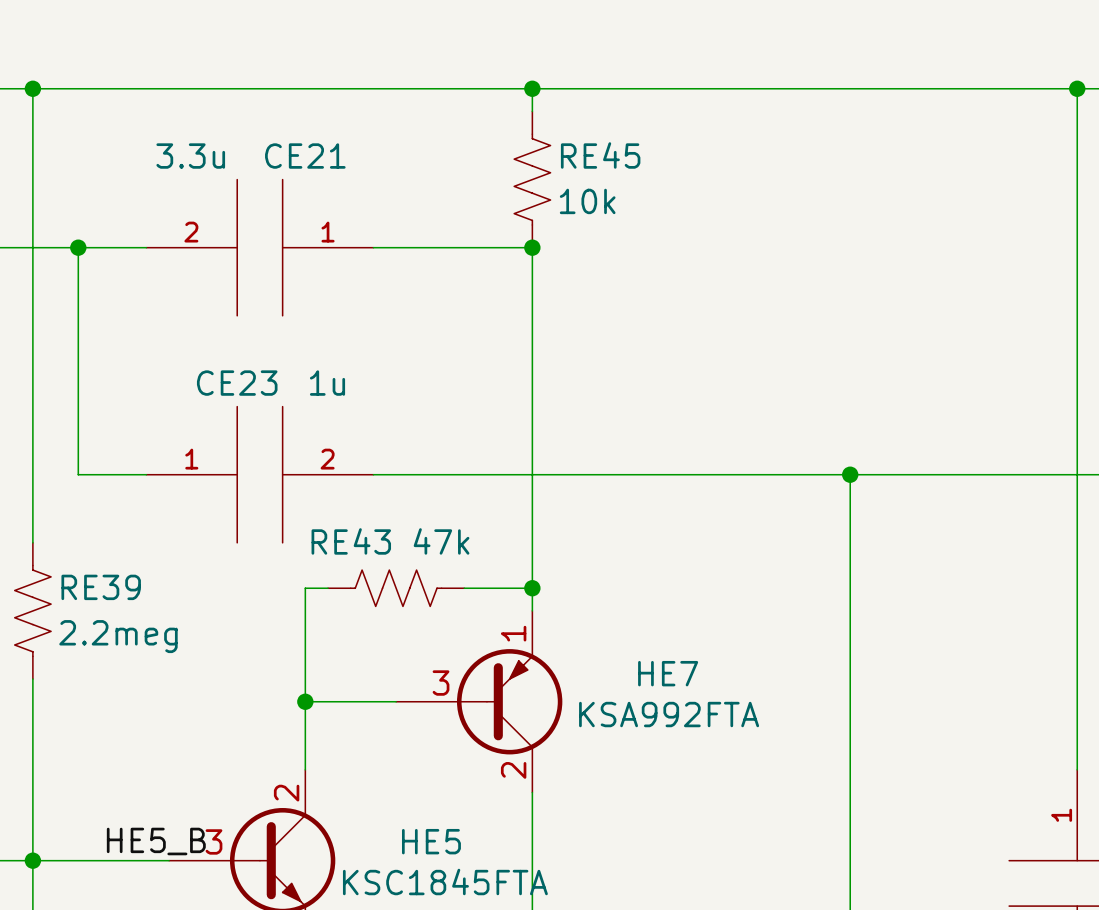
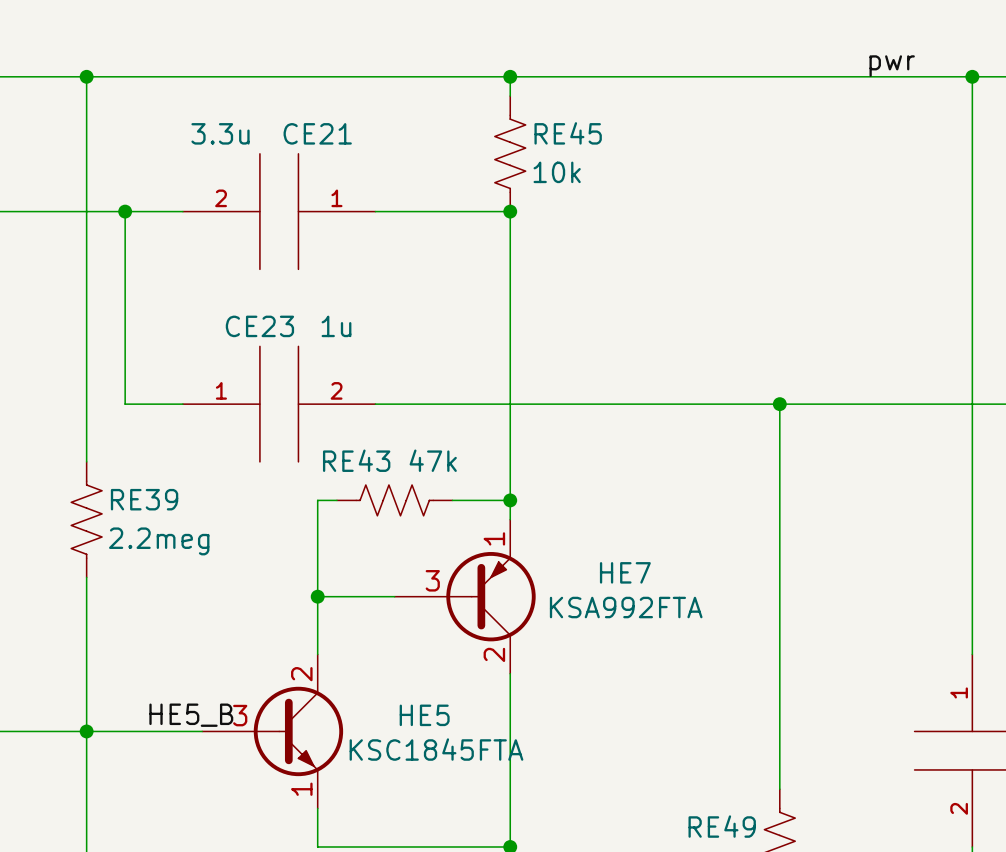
label: none -> pwr (892, 66)

